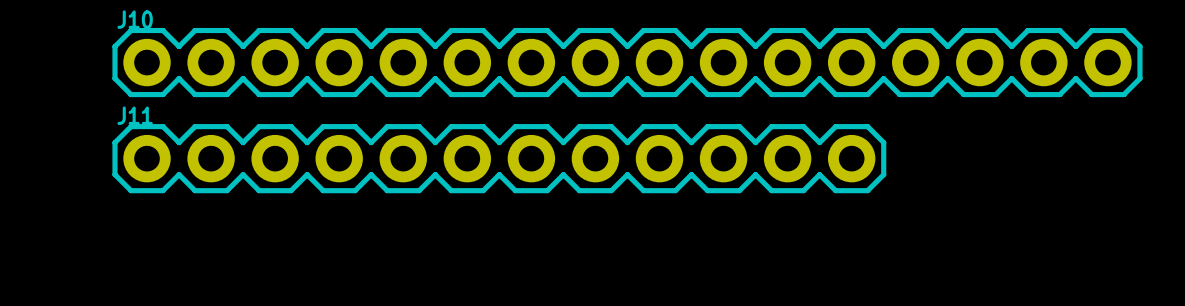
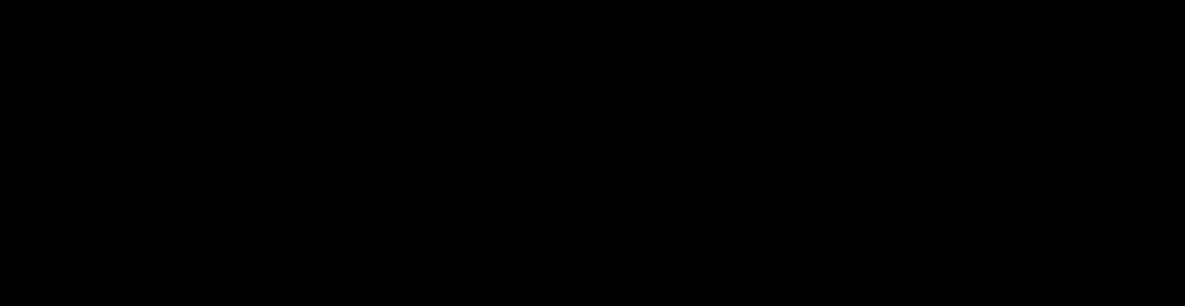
J10: (627, 62) -> none
J11: (499, 158) -> none

